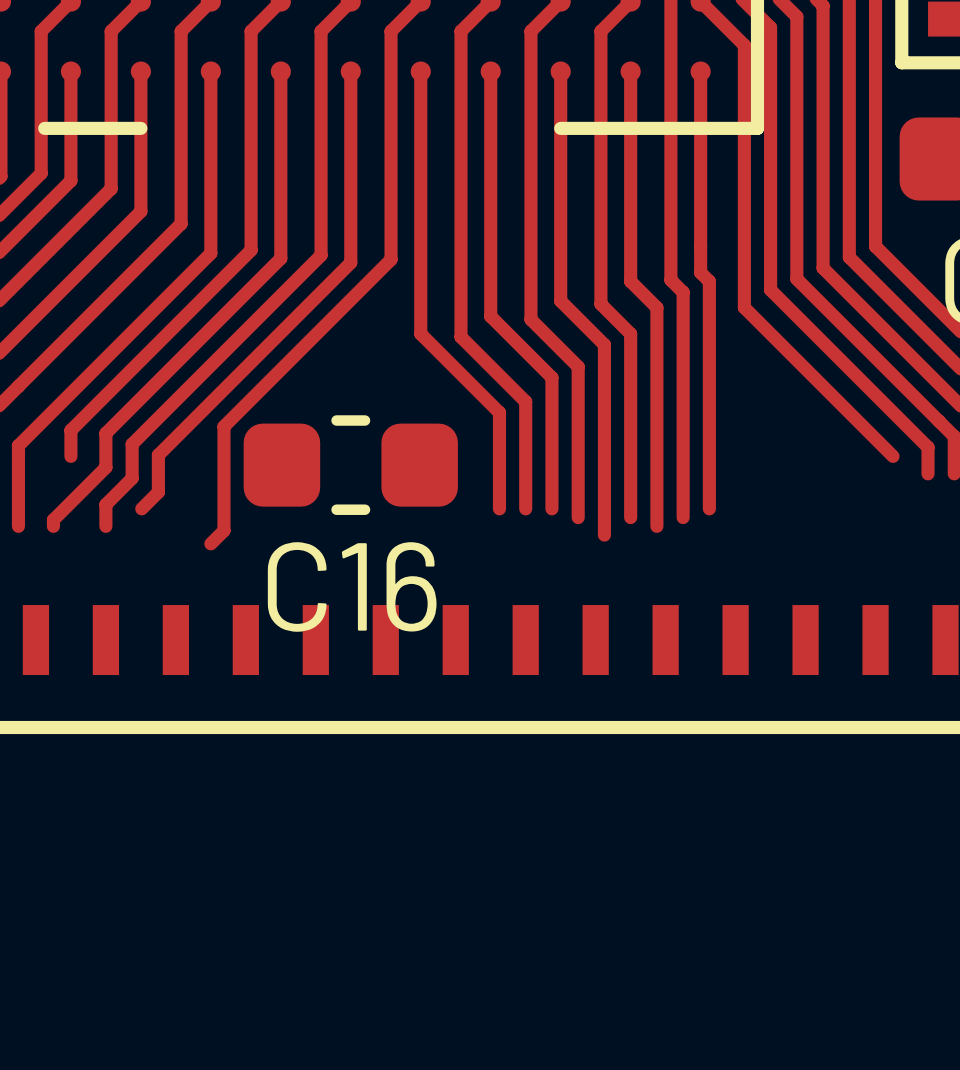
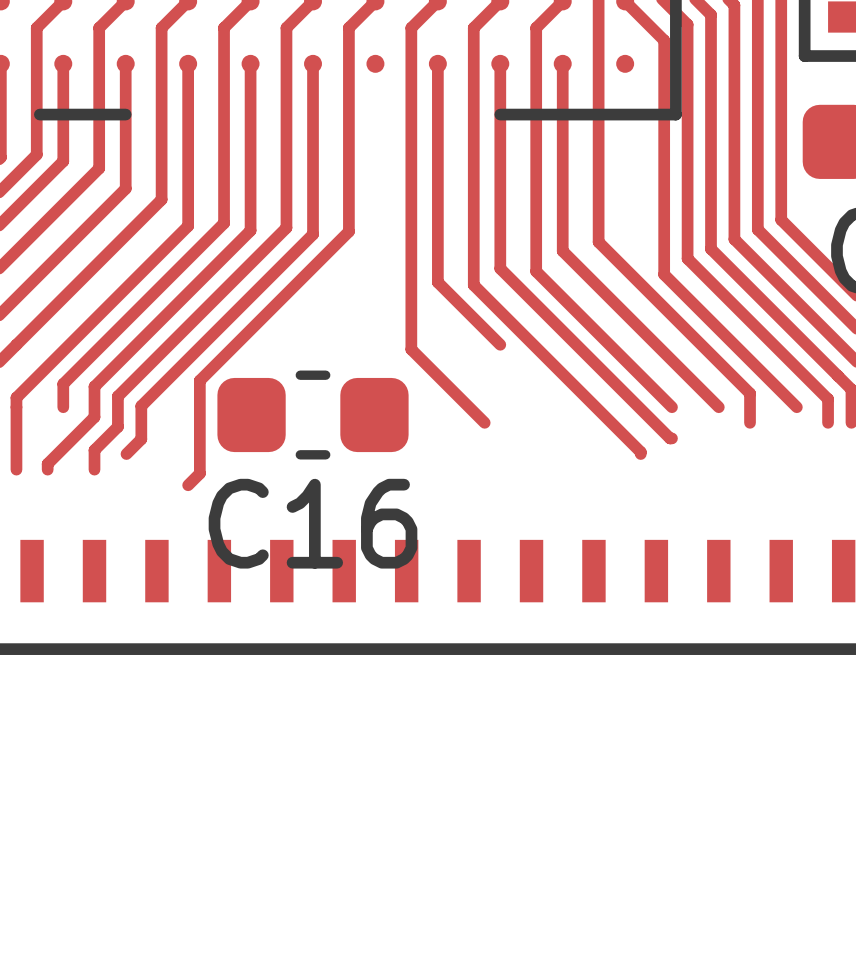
track: (420, 71) (420, 333) (499, 412) (499, 508) -> none
track: (700, 71) (700, 272) (709, 281) (709, 508) -> none
track: (670, 271) (670, 280) (683, 292) (683, 517) -> (598, 242) (750, 393) (750, 422)
track: (656, 307) (656, 526) -> (586, 274) (718, 407)
track: (630, 333) (630, 517) -> (562, 297) (671, 407)
track: (460, 337) (525, 401) (525, 508) -> (411, 300) (411, 349) (484, 422)
track: (604, 344) (604, 535) -> (539, 307) (671, 438)
track: (578, 366) (578, 517) -> (515, 327) (640, 454)
track: (551, 377) (551, 508) -> (492, 336) (500, 344)

